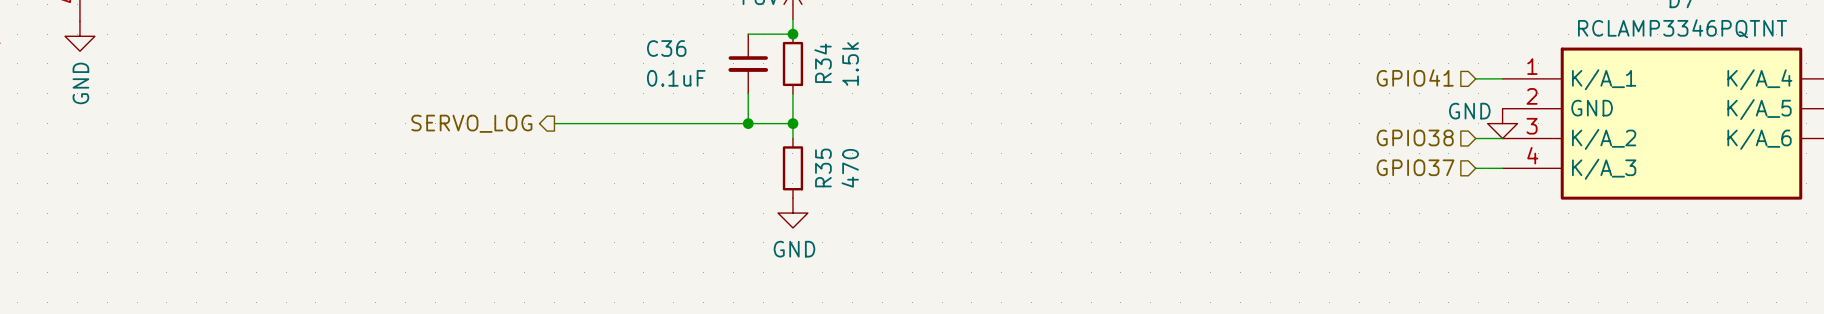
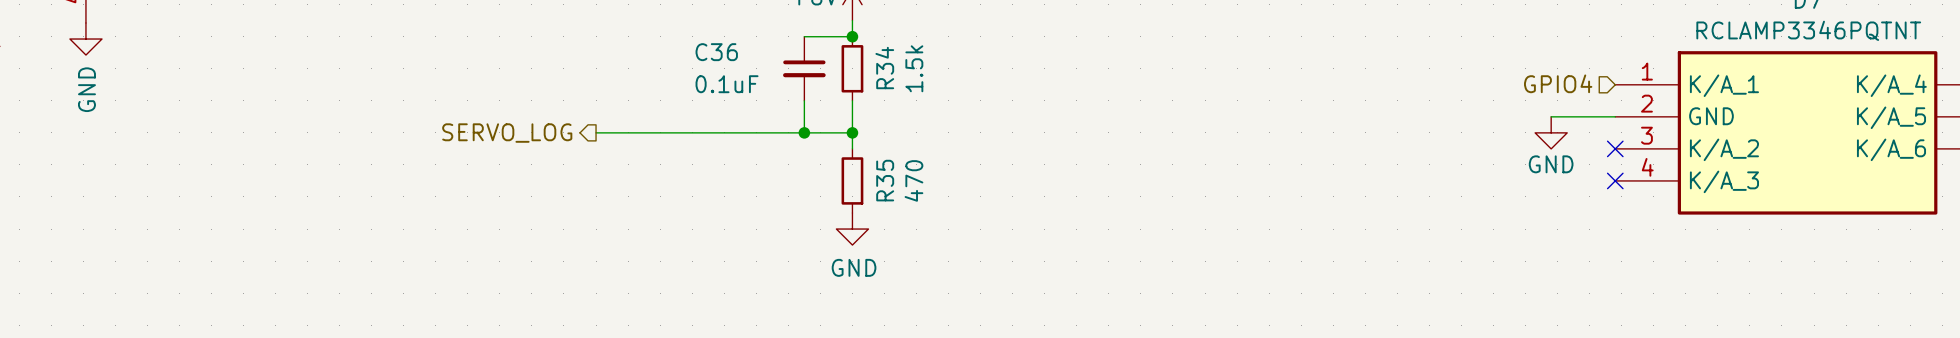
hierarchical label: GPIO41 (1415, 77) -> GPIO4 (1558, 83)
wire: (1475, 78) (1502, 78) -> none
wire: none -> (1551, 116) (1615, 116)
power symbol text position: GND (1469, 111) -> GND (1551, 164)
power symbol position: GND (1502, 123) -> GND (1551, 132)
hierarchical label: GPIO38 (1415, 137) -> none
wire: (1475, 138) (1502, 138) -> none
no-connect mark: none -> (1615, 148)
hierarchical label: GPIO37 (1415, 167) -> none
wire: (1475, 168) (1502, 168) -> none
no-connect mark: none -> (1615, 180)

